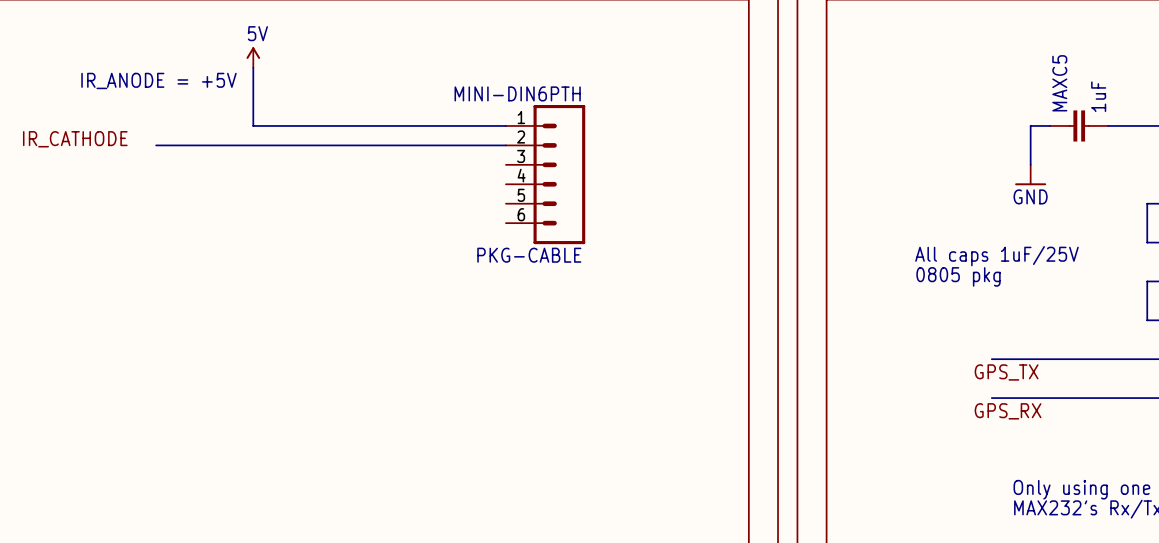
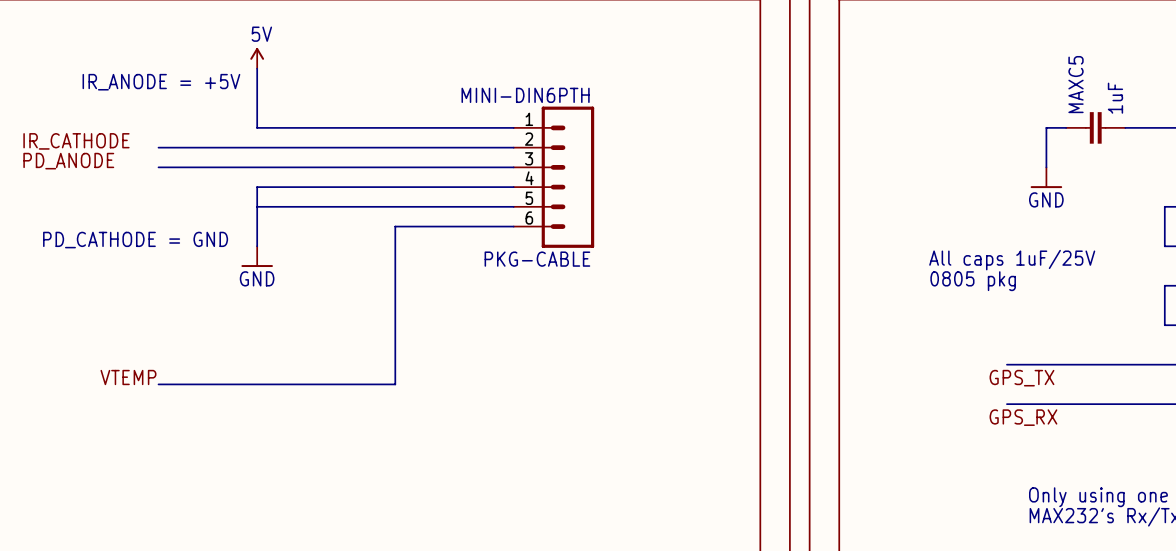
label: none -> PD_ANODE (68, 161)
wire: none -> (158, 167) (513, 167)
wire: none -> (513, 187) (257, 187) (257, 246)
wire: none -> (257, 206) (513, 206)
wire: none -> (513, 226) (395, 226) (395, 384) (158, 384)
text: none -> PD_CATHODE = GND (135, 240)
power symbol: none -> GND (257, 256)
label: none -> VTEMP (128, 377)

